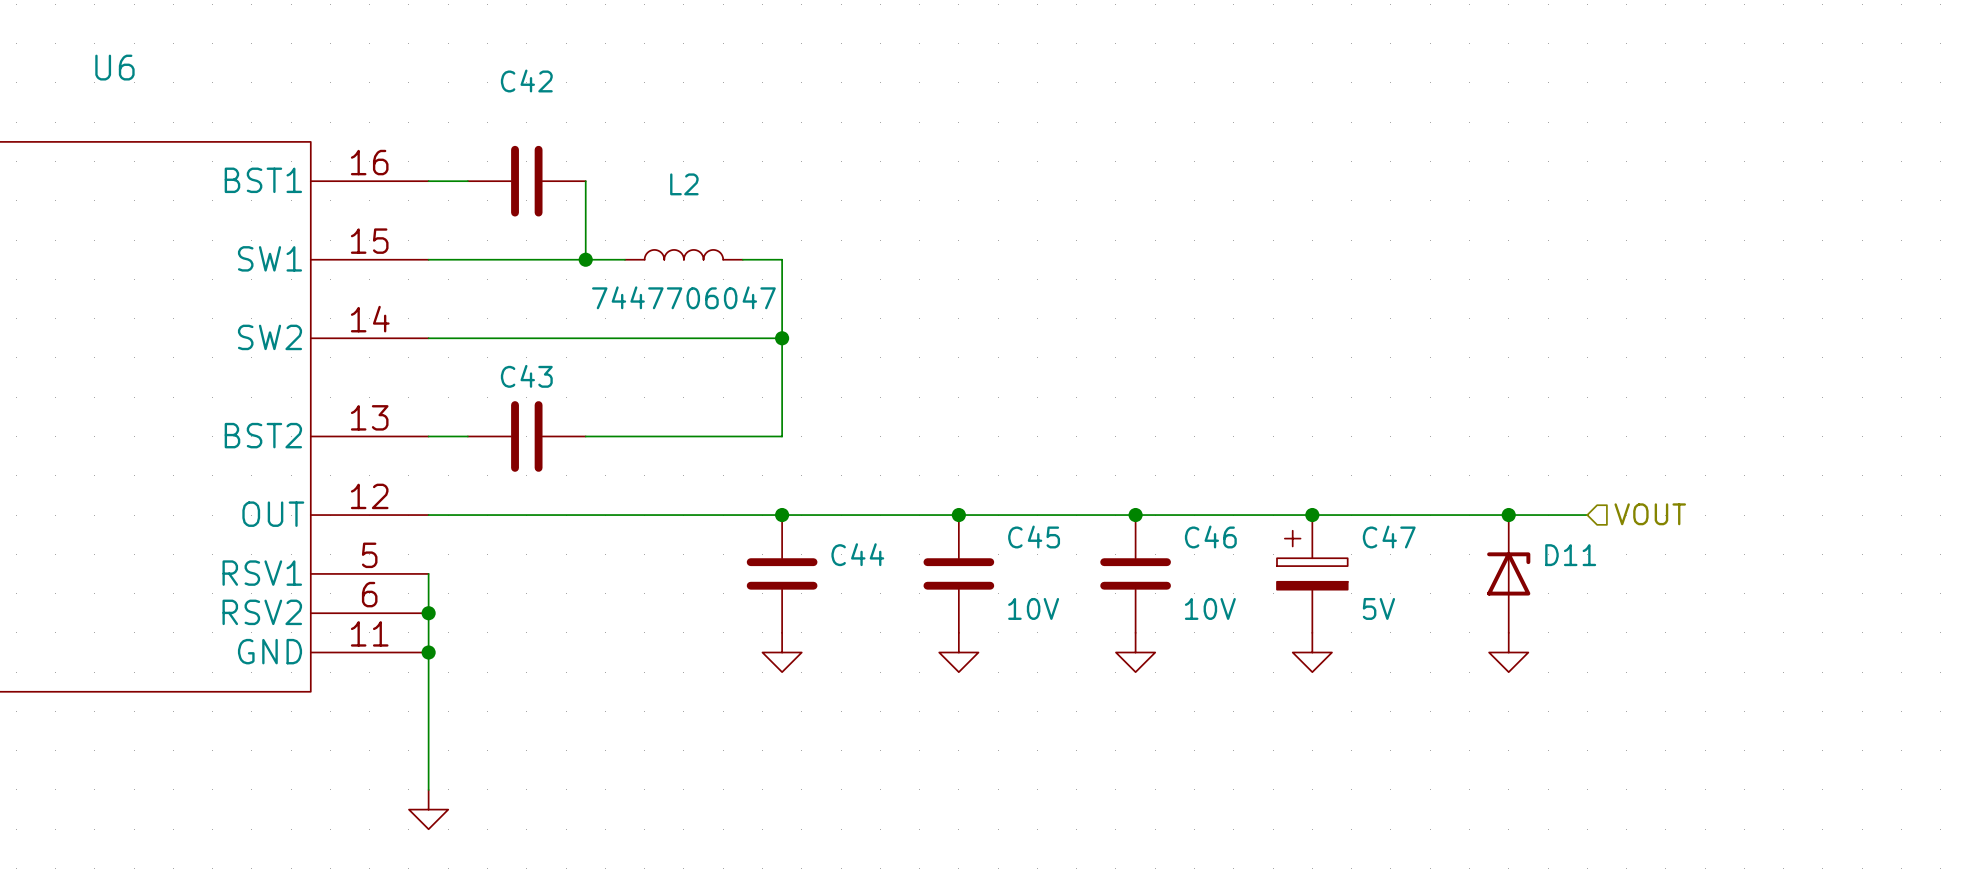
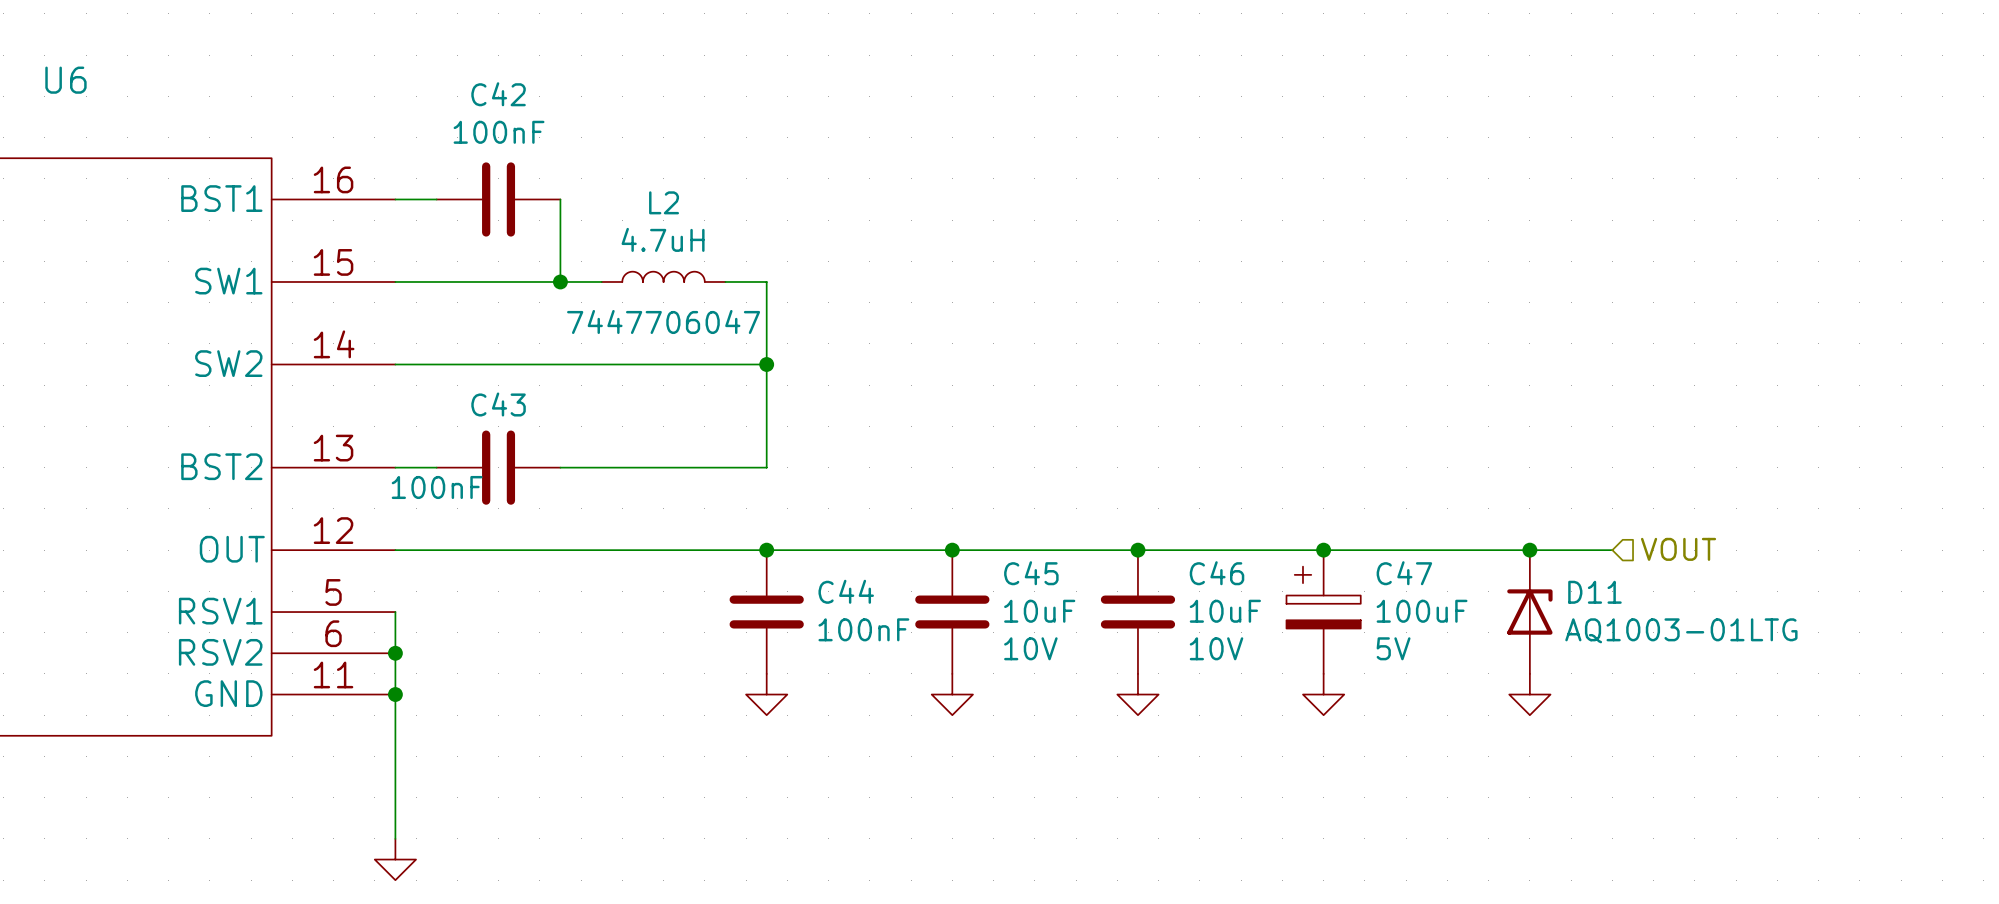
C42 value: none -> 100nF (499, 132)
L2 value: none -> 4.7uH (663, 239)
C43 value: none -> 100nF (437, 487)
C45 value: none -> 10uF (1039, 611)
C46 value: none -> 10uF (1225, 611)
C47 value: none -> 100uF (1422, 611)
C44 value: none -> 100nF (863, 629)
D11 value: none -> AQ1003-01LTG (1681, 630)

